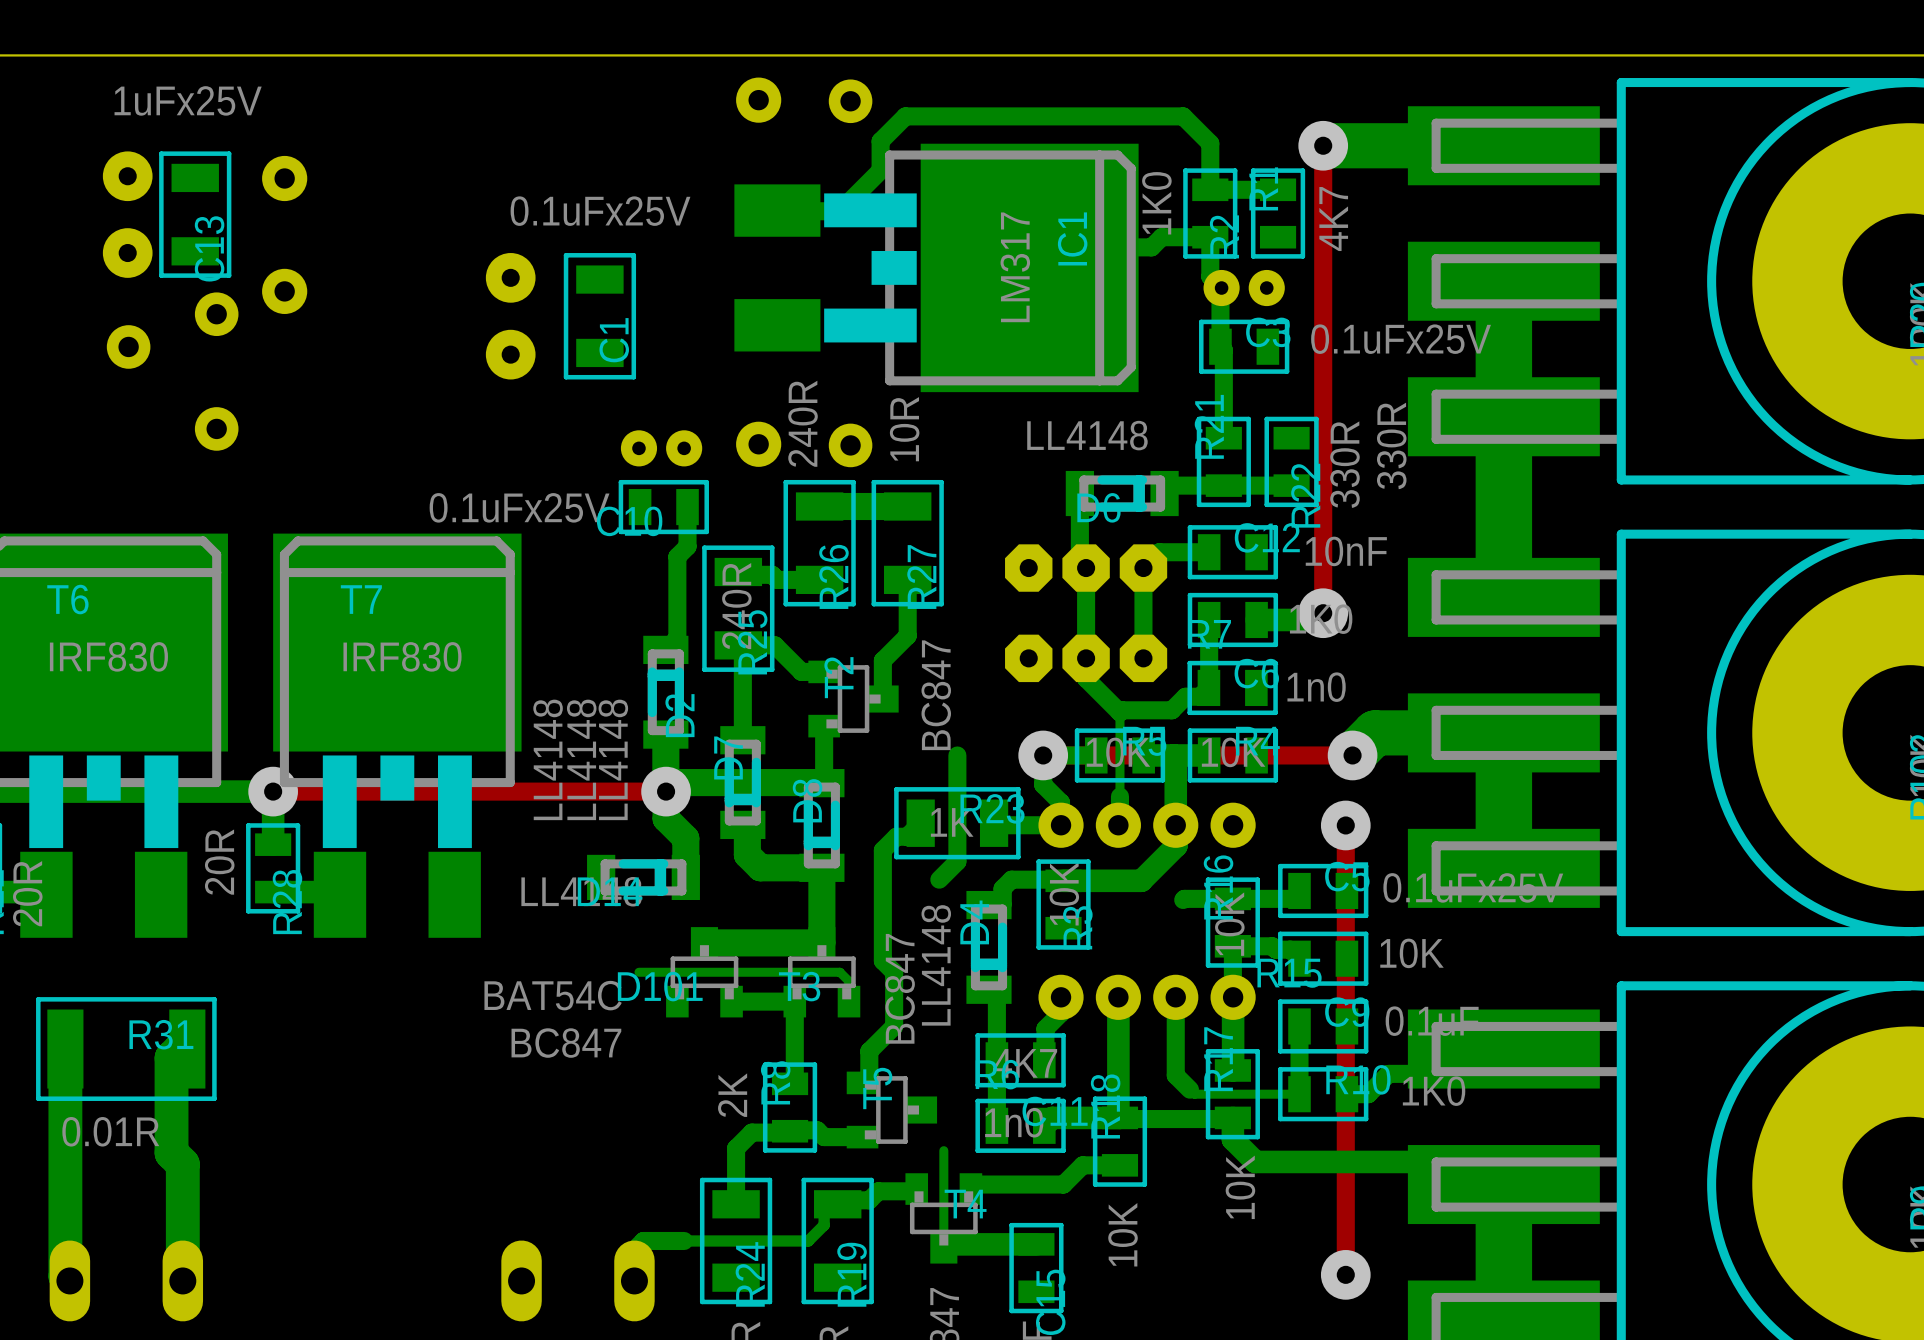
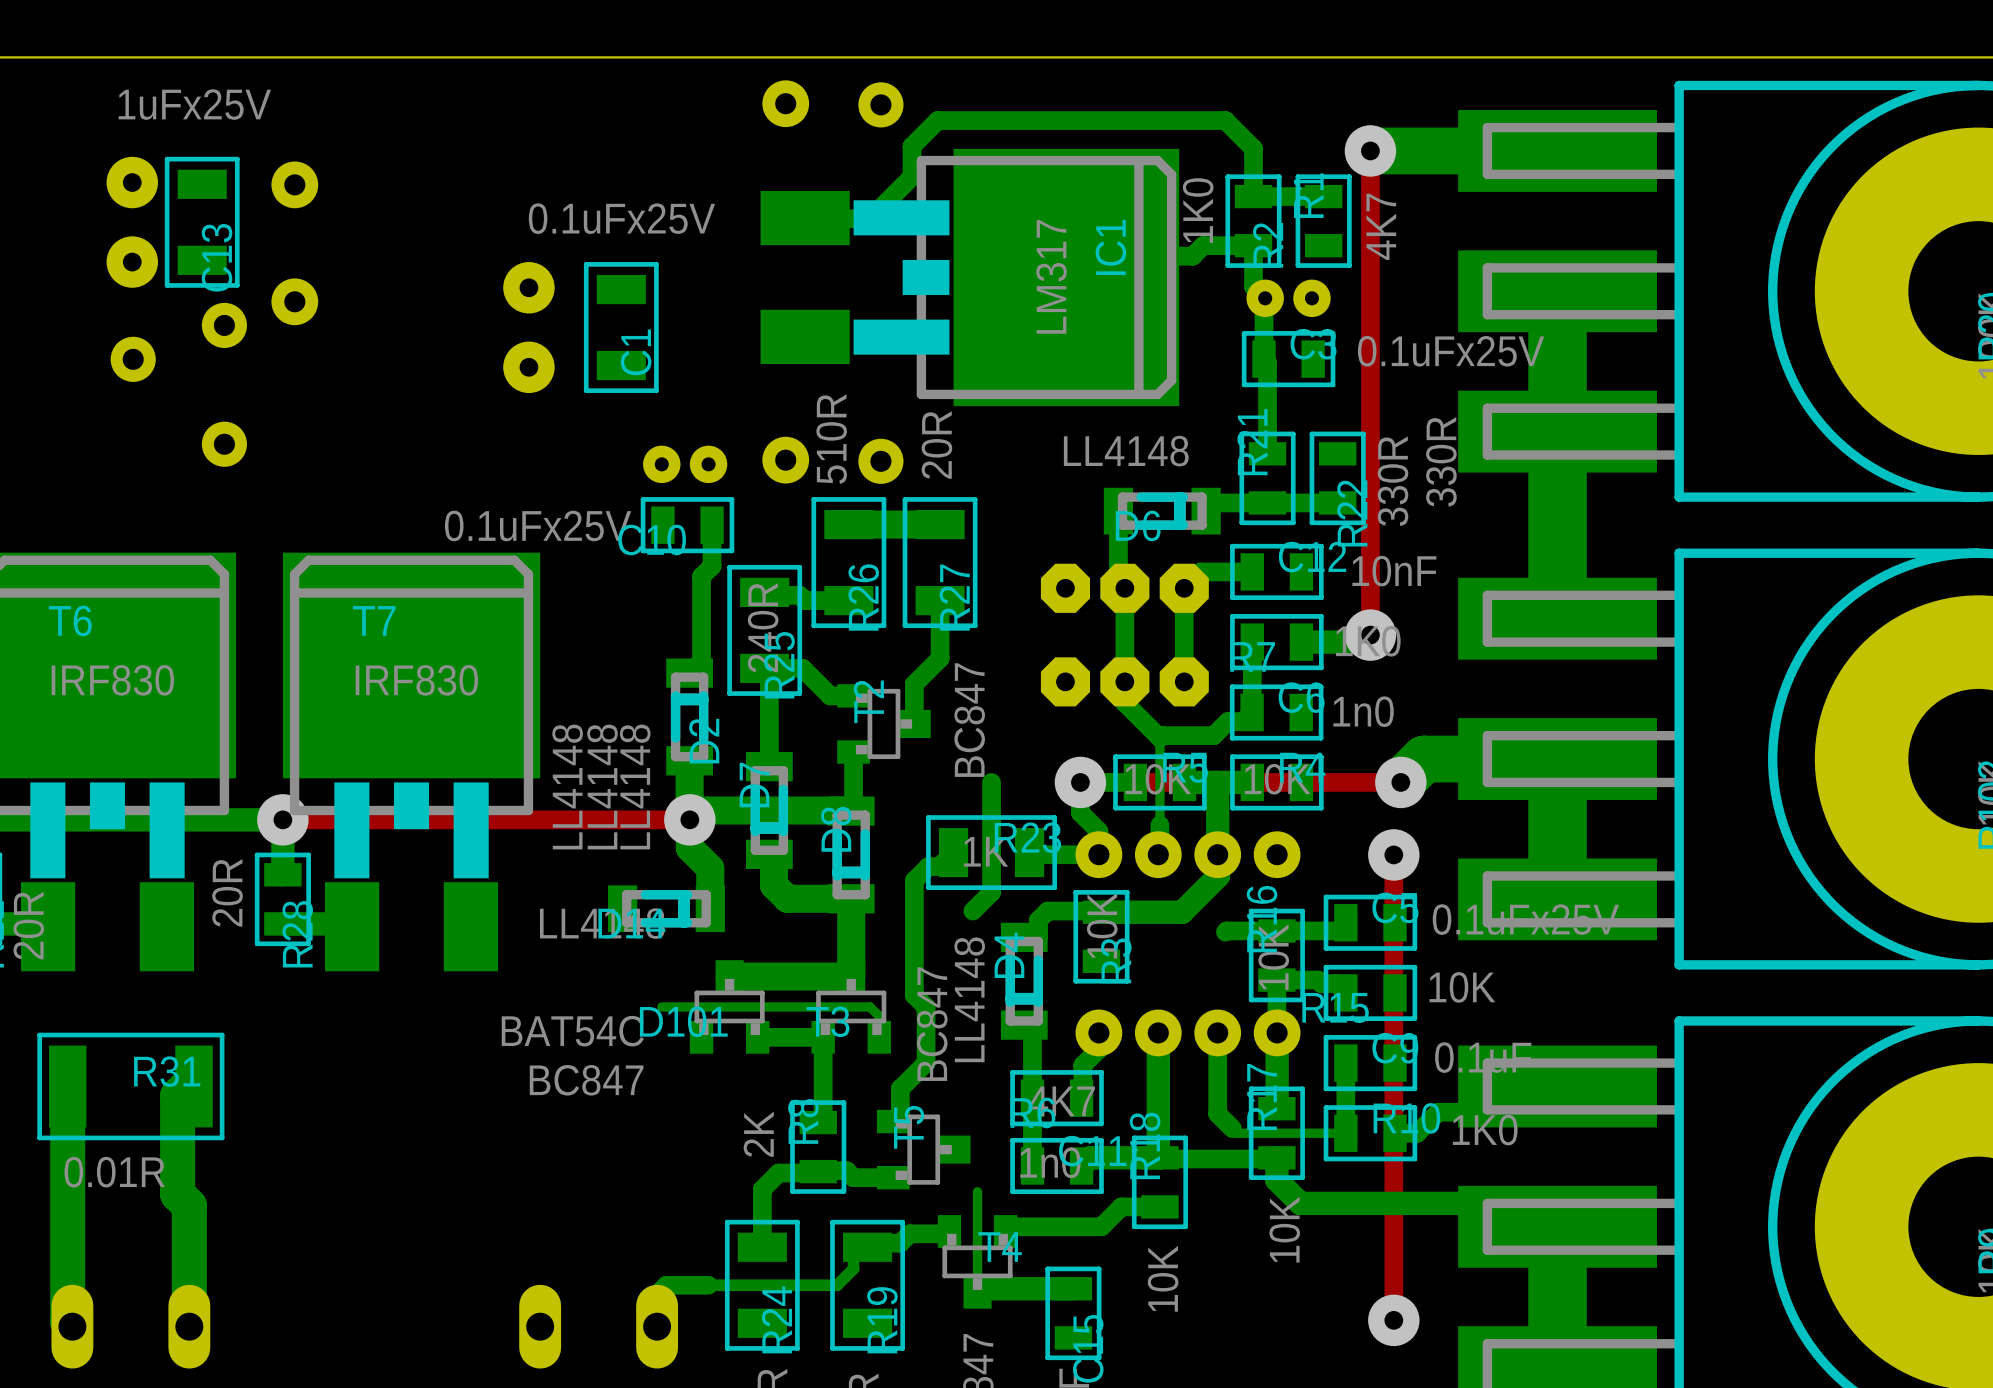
R26 value: 240R (803, 423) -> 510R (831, 439)
R27 value: 10R (904, 429) -> 20R (936, 445)

